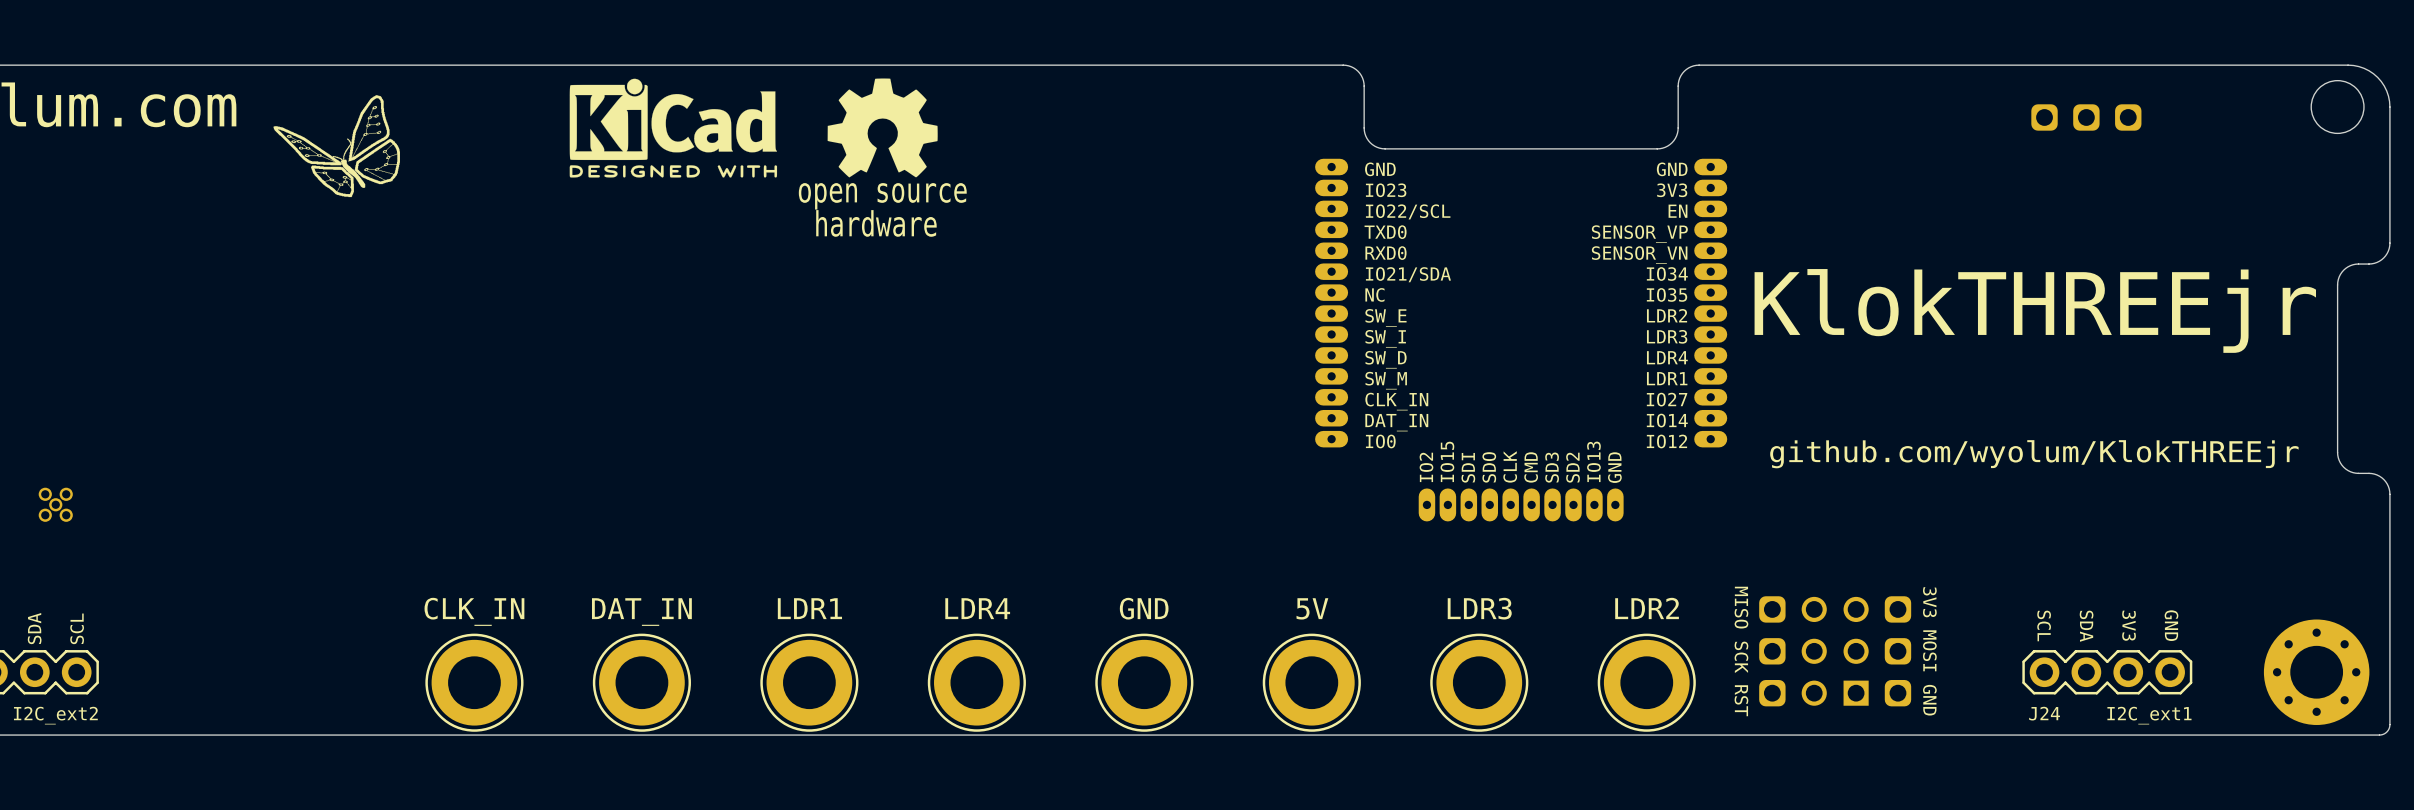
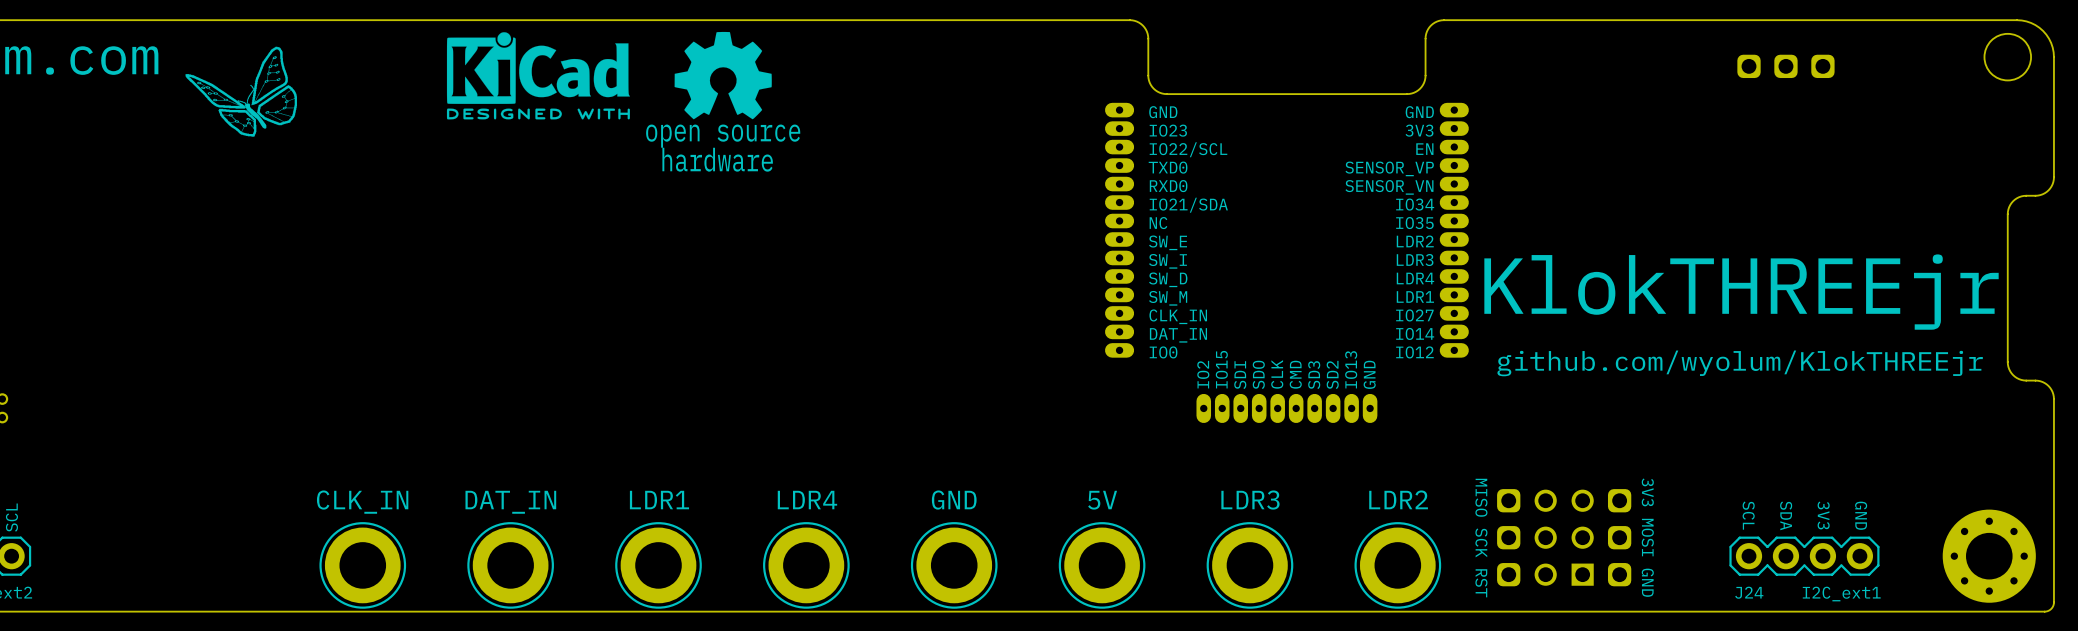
text position: KlokTHREEjr (2035, 310) -> KlokTHREEjr (1741, 292)

